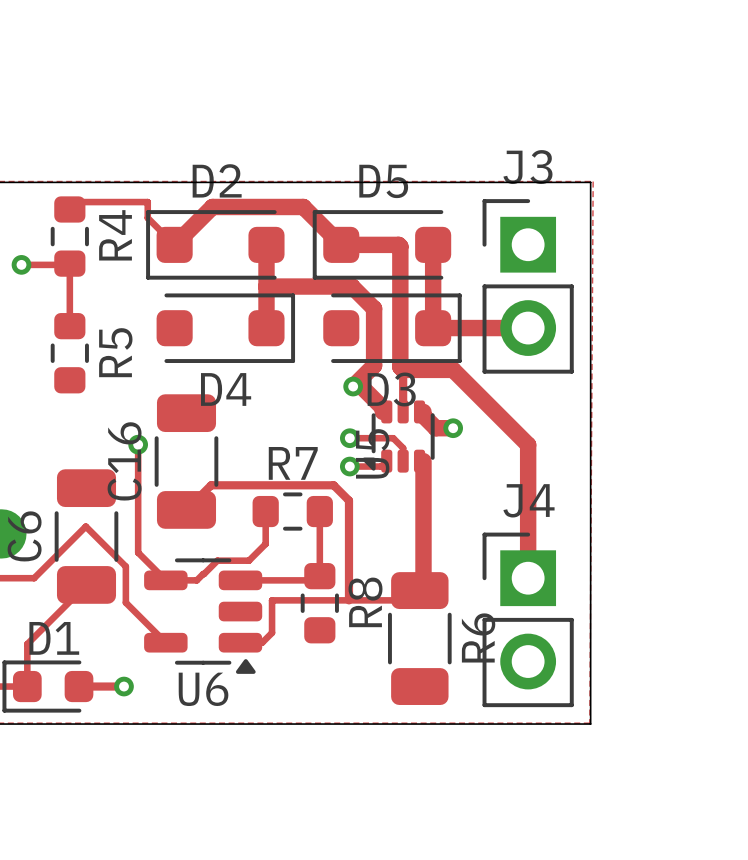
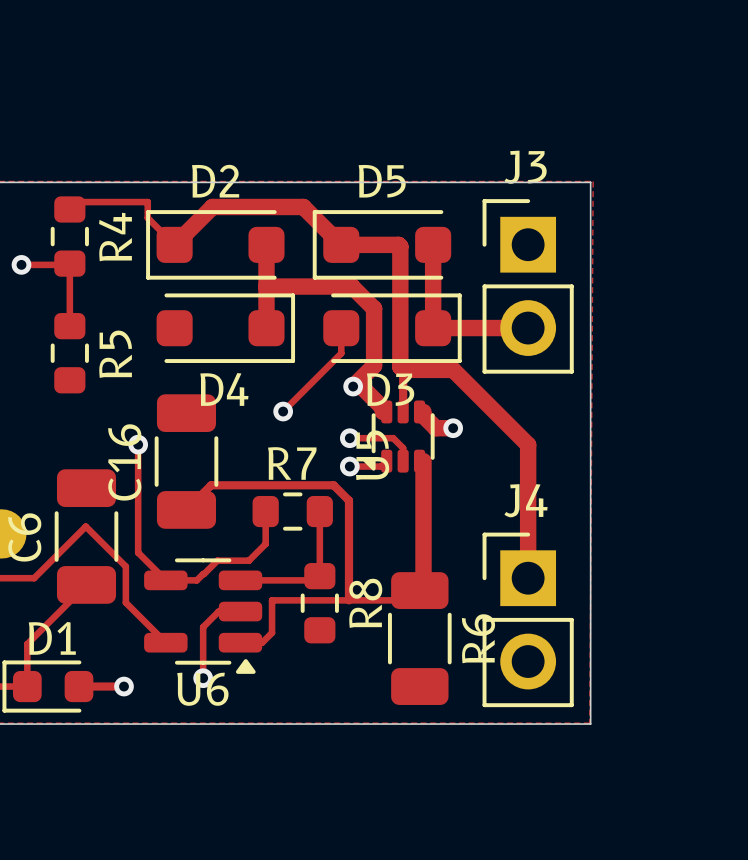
track: none -> (341, 328) (341, 353) (283, 411)
via: none -> (283, 411)
track: none -> (240, 611) (218, 611) (203, 627) (203, 678)
via: none -> (203, 678)

